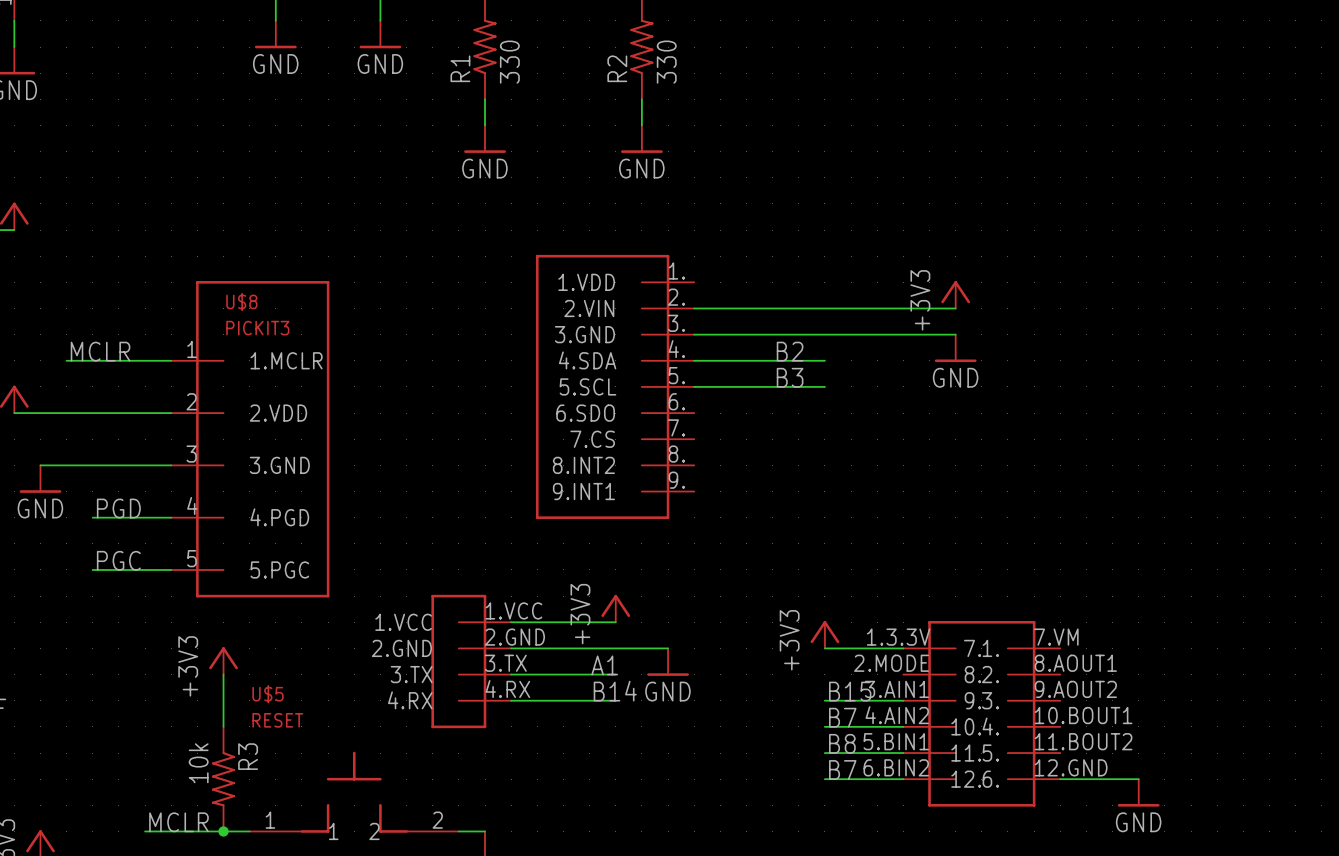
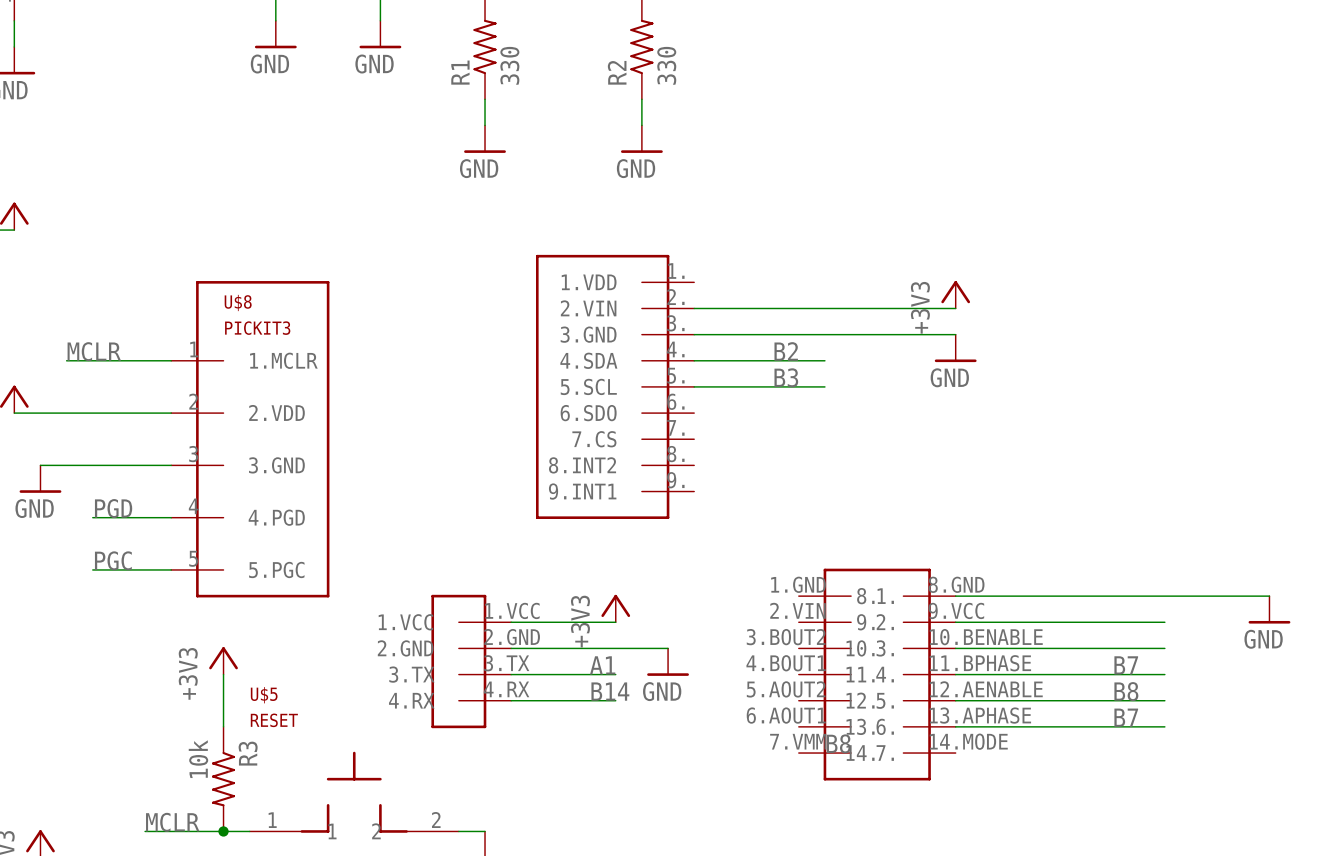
wire: none -> (955, 596) (1269, 596)
wire: none -> (955, 622) (1164, 622)
power symbol: +3V3 (824, 634) -> none
wire: (824, 648) (903, 648) -> none
wire: none -> (955, 648) (1164, 648)
label: none -> B7 (1126, 665)
part: none -> (877, 674)
wire: none -> (955, 674) (1164, 674)
label: B15 (850, 691) -> none
label: none -> B8 (1126, 691)
wire: (824, 700) (903, 700) -> none
wire: none -> (955, 700) (1164, 700)
part: (981, 713) -> none
label: B7 (842, 717) -> none
label: none -> B7 (1126, 717)
wire: (824, 726) (903, 726) -> none
wire: none -> (955, 726) (1164, 726)
wire: (824, 753) (903, 753) -> none
label: B7 (842, 770) -> none
wire: (1060, 779) (1138, 779) -> none
power symbol position: GND (1138, 792) -> GND (1269, 609)

